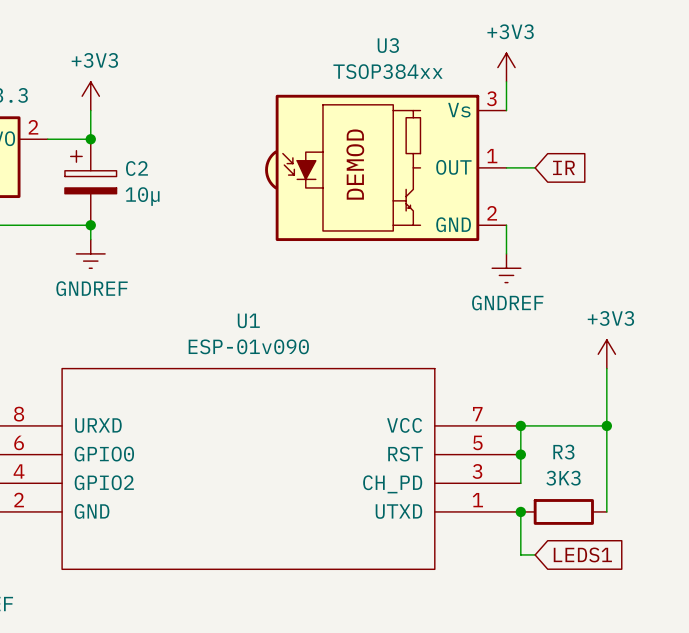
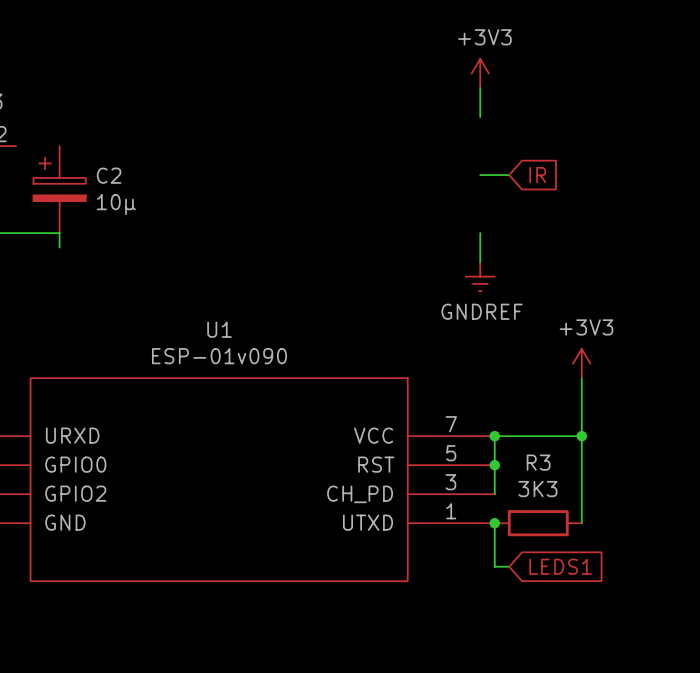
power symbol: +3V3 (90, 96) -> none
wire: (90, 110) (90, 139) (47, 139) -> none
junction: (90, 139) -> none
U3: TSOP384xx (385, 167) -> none
junction: (90, 225) -> none
power symbol: GNDREF (90, 253) -> none

